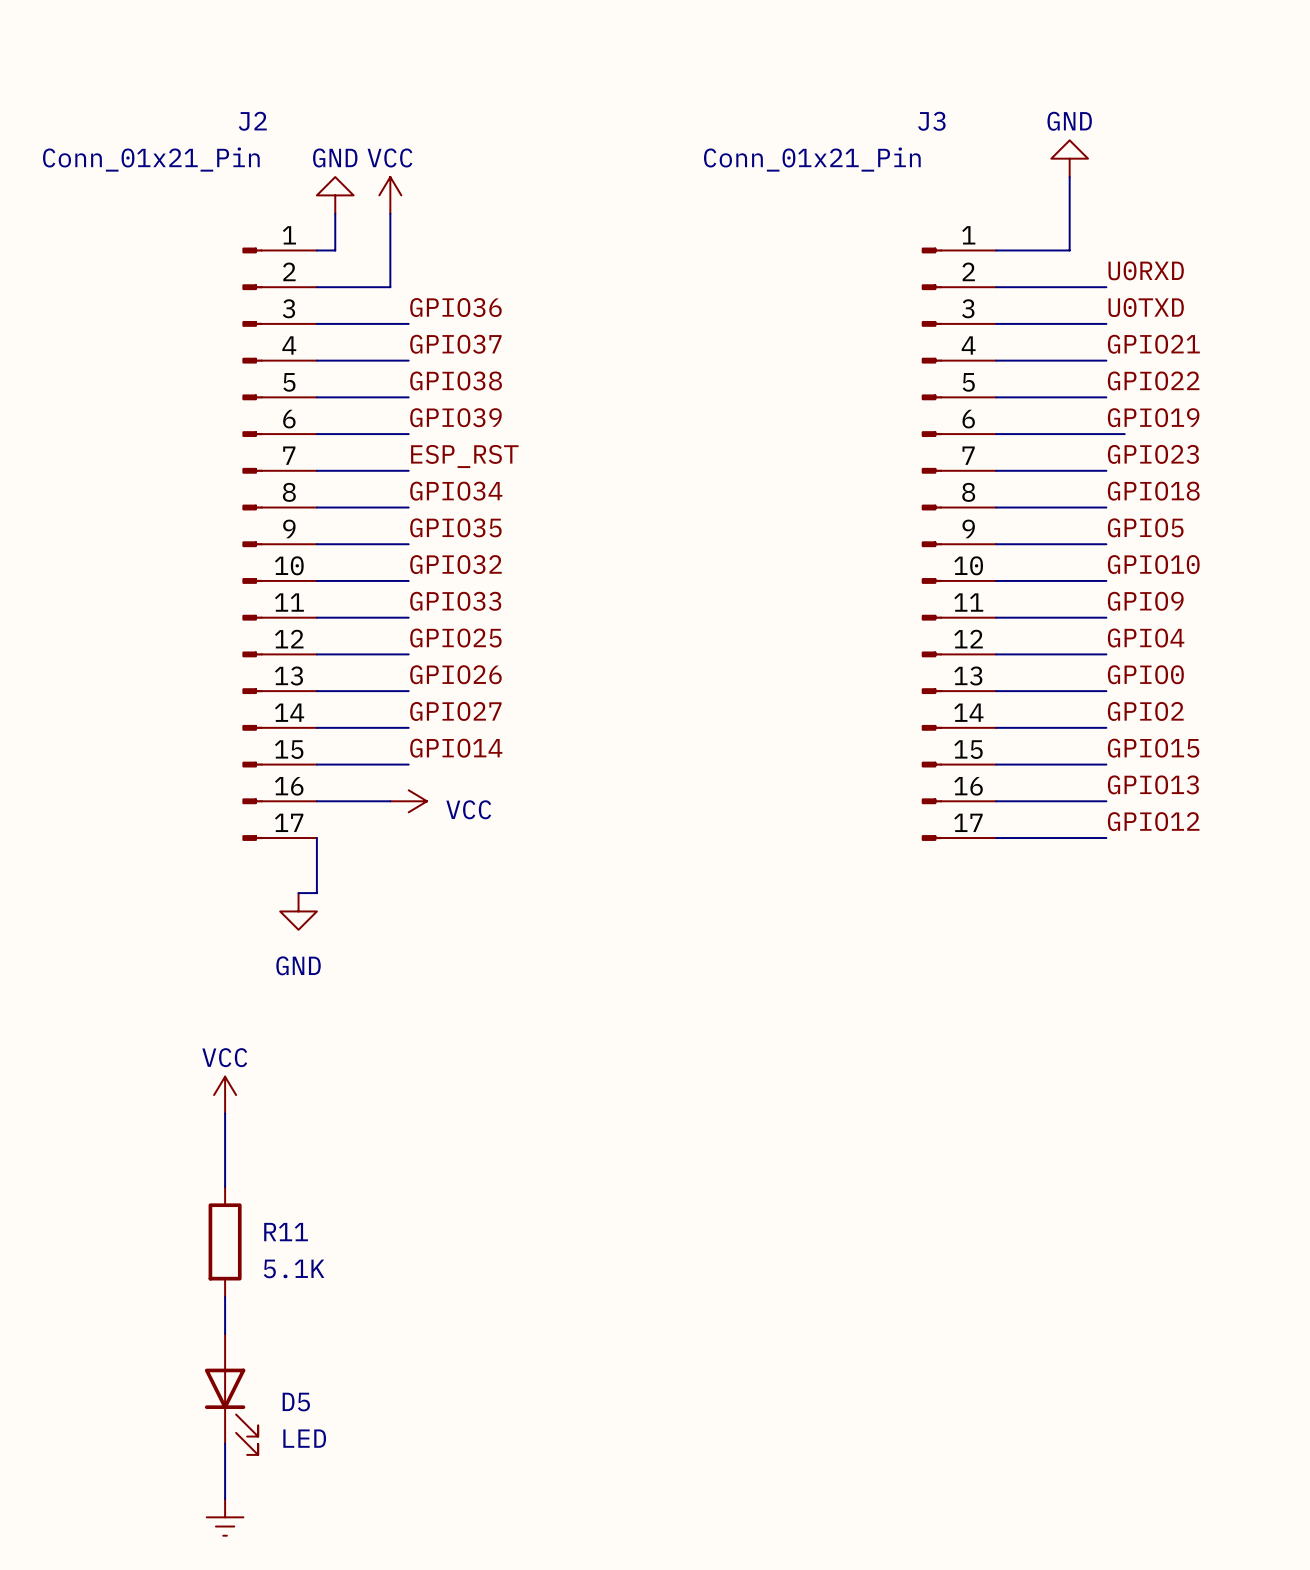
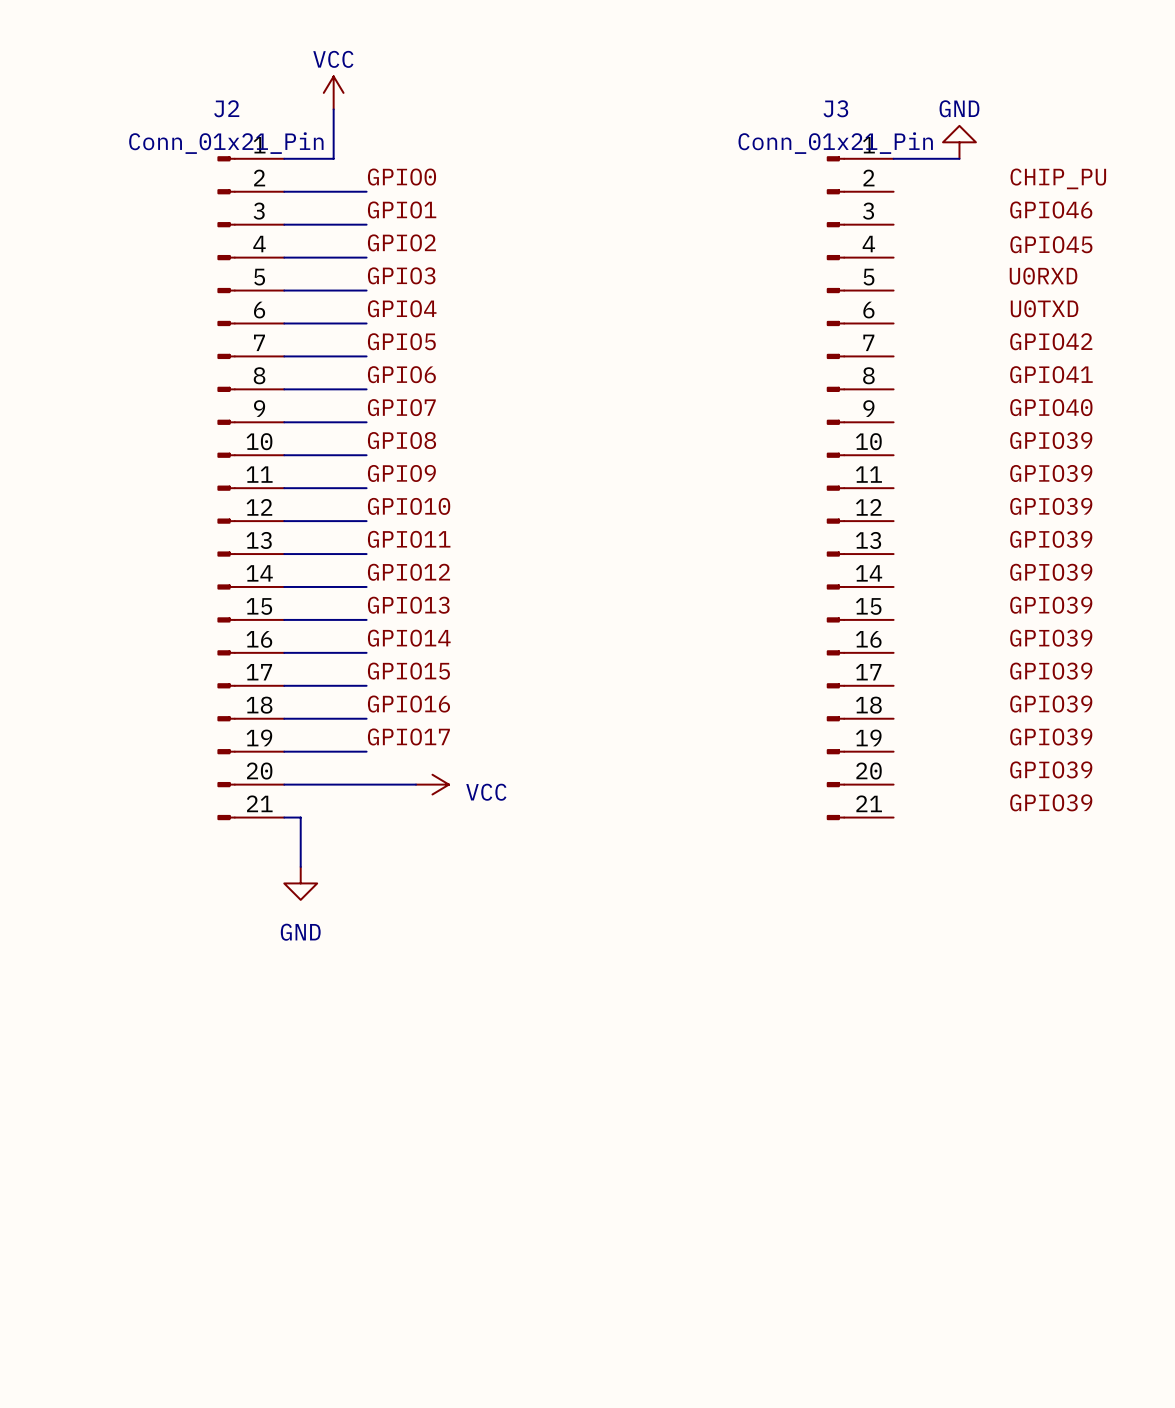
wire: none -> (333, 109) (333, 158) (284, 158)
J2 value position: Conn_01x21_Pin (151, 159) -> Conn_01x21_Pin (226, 143)
J3 value position: Conn_01x21_Pin (812, 159) -> Conn_01x21_Pin (835, 143)
wire: (1069, 177) (1069, 250) (996, 250) -> (959, 158) (893, 158)
power symbol: GND (335, 195) -> none
power symbol position: VCC (390, 195) -> VCC (333, 92)
label: none -> GPIO0 (401, 177)
label: none -> CHIP_PU (1058, 178)
wire: none -> (284, 191) (366, 191)
wire: (335, 213) (335, 250) -> (366, 224) (300, 224)
wire: (390, 213) (390, 287) -> (366, 257) (350, 257)
label: none -> GPIO1 (402, 209)
label: none -> GPIO46 (1051, 209)
J2 symbol: [242, 247, 317, 841] -> [217, 156, 285, 821]
J3 symbol: [921, 247, 997, 841] -> [826, 156, 894, 821]
label: none -> GPIO2 (401, 242)
label position: U0RXD (1146, 270) -> U0RXD (1043, 276)
label: none -> GPIO45 (1051, 244)
wire: (996, 287) (1106, 287) -> none
label: GPIO36 (455, 307) -> GPIO3 (401, 275)
label position: U0TXD (1146, 307) -> U0TXD (1044, 308)
wire: (996, 323) (1106, 323) -> none
label: GPIO37 (455, 344) -> GPIO4 (402, 308)
label: GPIO21 (1153, 344) -> none
wire: (996, 360) (1106, 360) -> none
label: GPIO38 (456, 380) -> GPIO5 (401, 341)
label: GPIO22 (1153, 380) -> GPIO42 (1051, 341)
wire: (996, 397) (1106, 397) -> none
label: GPIO39 (455, 417) -> GPIO6 (401, 374)
label: GPIO19 (1153, 417) -> GPIO41 (1051, 374)
wire: (996, 434) (1124, 434) -> none
label: GPIO23 (1153, 454) -> GPIO40 (1051, 407)
label: ESP_RST (464, 456) -> GPIO7 (401, 407)
wire: (996, 470) (1106, 470) -> none
label: GPIO34 (456, 491) -> GPIO8 (402, 440)
label: GPIO18 (1153, 491) -> GPIO39 (1051, 440)
wire: (996, 507) (1106, 507) -> none
label: GPIO35 (455, 527) -> GPIO9 (401, 473)
label: GPIO5 (1145, 527) -> GPIO39 (1051, 473)
wire: (996, 544) (1106, 544) -> none
label: GPIO32 (455, 564) -> GPIO10 (409, 506)
label: GPIO10 (1153, 564) -> GPIO39 (1051, 506)
wire: (996, 580) (1106, 580) -> none
label: GPIO33 (455, 601) -> GPIO11 (409, 539)
label: GPIO9 (1145, 601) -> GPIO39 (1051, 539)
wire: (996, 617) (1106, 617) -> none
label: GPIO25 (455, 638) -> GPIO12 (408, 572)
label: GPIO4 (1146, 638) -> GPIO39 (1051, 572)
wire: (996, 654) (1106, 654) -> none
label: GPIO26 (455, 674) -> GPIO13 (408, 605)
label: GPIO0 (1145, 674) -> GPIO39 (1051, 605)
wire: (996, 691) (1106, 691) -> none
label: GPIO27 (455, 711) -> GPIO14 (409, 638)
label: GPIO2 (1145, 711) -> GPIO39 (1051, 638)
wire: (996, 727) (1106, 727) -> none
label: GPIO14 (456, 748) -> GPIO15 (408, 671)
label: GPIO15 (1153, 748) -> GPIO39 (1051, 671)
wire: (996, 764) (1106, 764) -> none
label: none -> GPIO16 (408, 704)
label: GPIO13 (1153, 784) -> GPIO39 (1051, 704)
power symbol position: VCC (408, 801) -> VCC (432, 784)
wire: (996, 801) (1106, 801) -> none
label: none -> GPIO17 (408, 736)
label: GPIO12 (1153, 821) -> GPIO39 (1051, 736)
wire: (316, 838) (316, 893) (298, 893) -> (284, 751) (366, 751)
wire: (996, 838) (1106, 838) -> none
label: none -> GPIO39 (1051, 769)
wire: none -> (284, 784) (416, 784)
label: none -> GPIO39 (1051, 802)
power symbol position: GND (298, 911) -> GND (300, 883)
wire: none -> (284, 817) (300, 817) (300, 866)
power symbol: VCC (225, 1095) -> none
wire: (225, 1113) (225, 1186) -> none
R11: 5.1K (225, 1241) -> none
wire: (225, 1297) (225, 1333) -> none
D5: LED (231, 1394) -> none
wire: (225, 1443) (225, 1498) -> none
power symbol: (225, 1517) -> none

